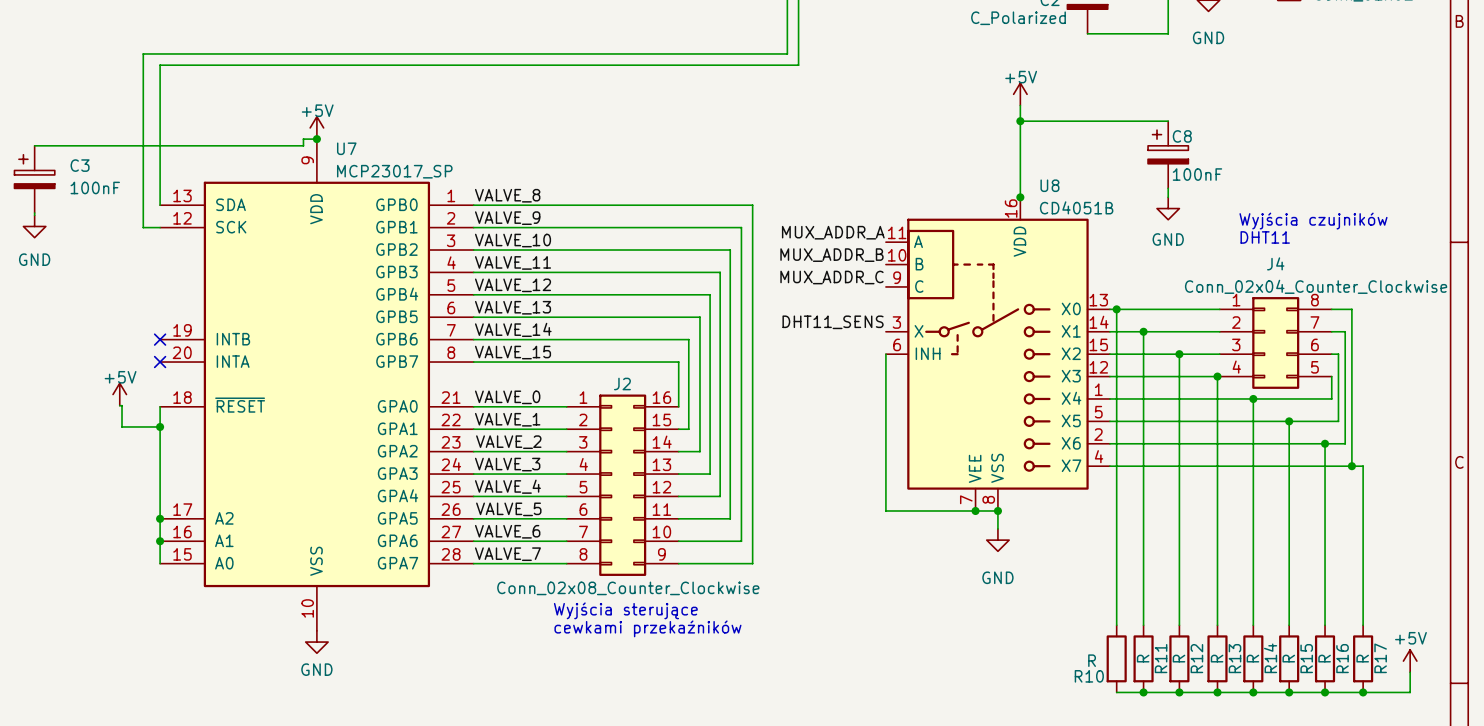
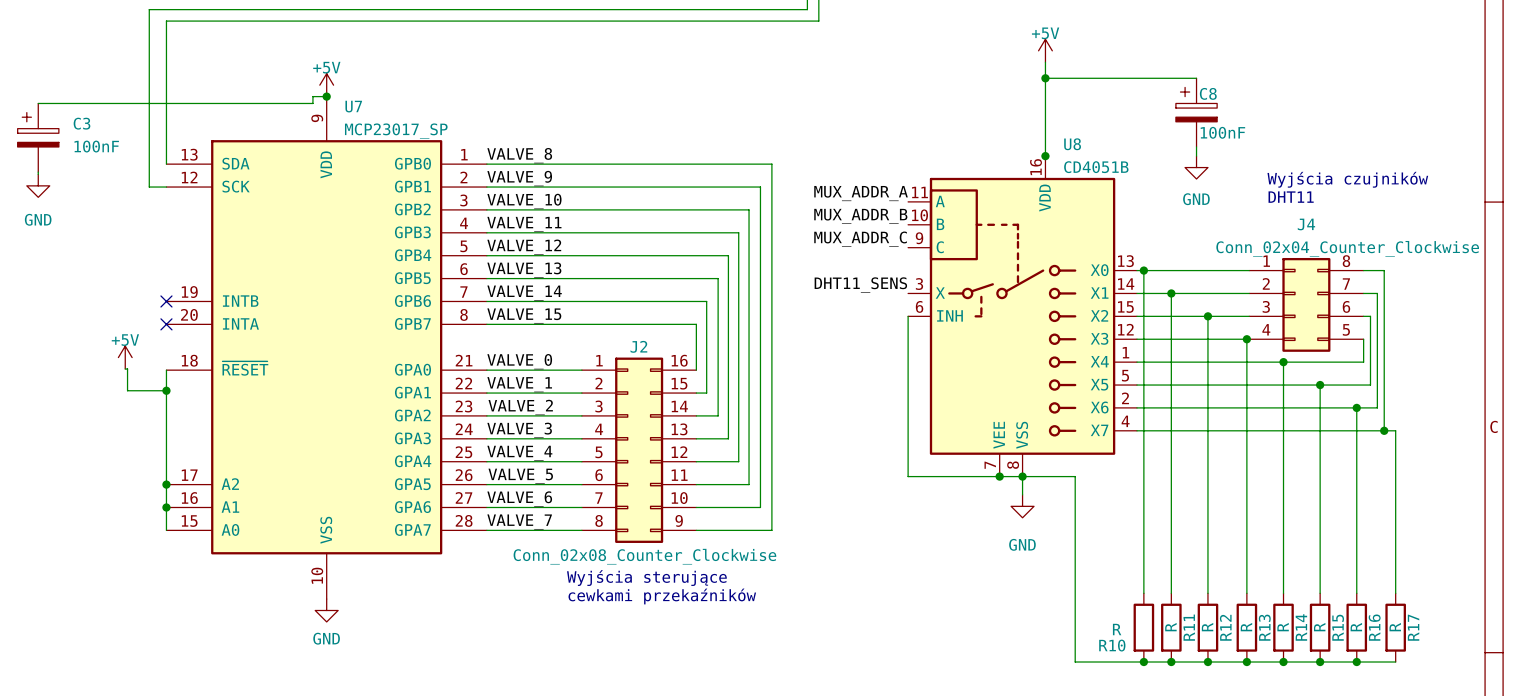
wire: none -> (1022, 476) (1075, 476) (1075, 662) (1143, 662)
power symbol: +5V (1410, 661) -> none
wire: (1410, 672) (1410, 692) (1363, 692) -> none
junction: none -> (1143, 662)
junction: (1363, 692) -> none

